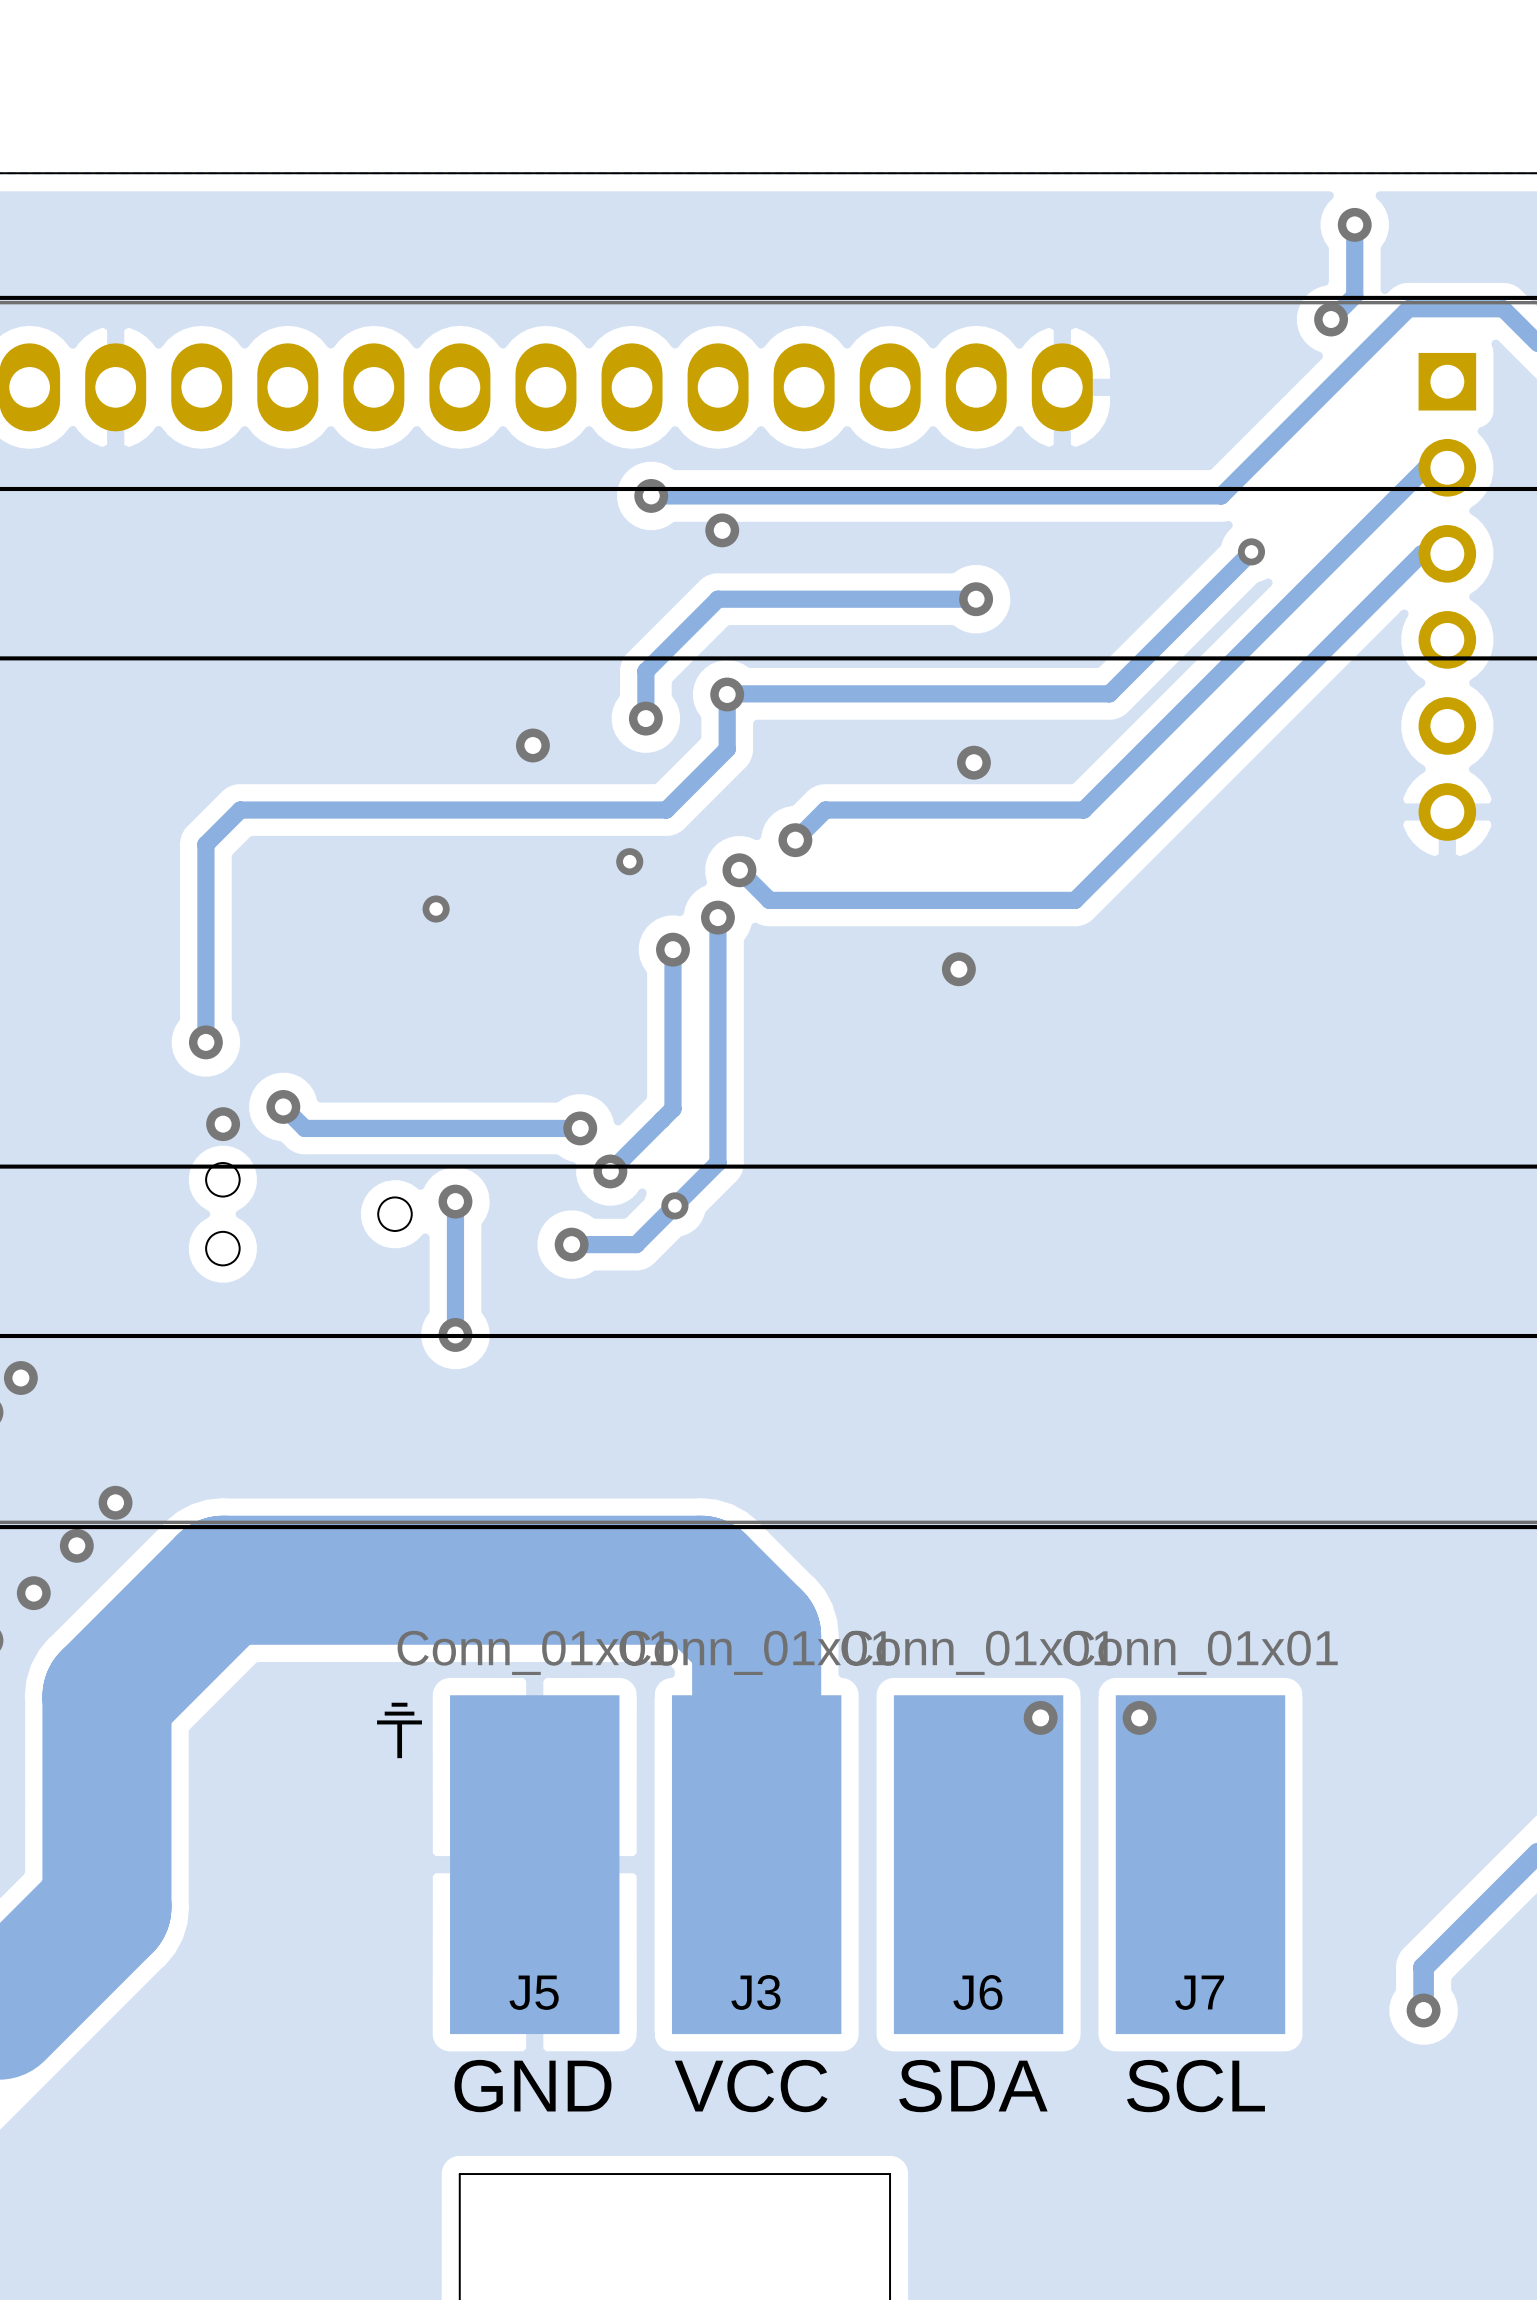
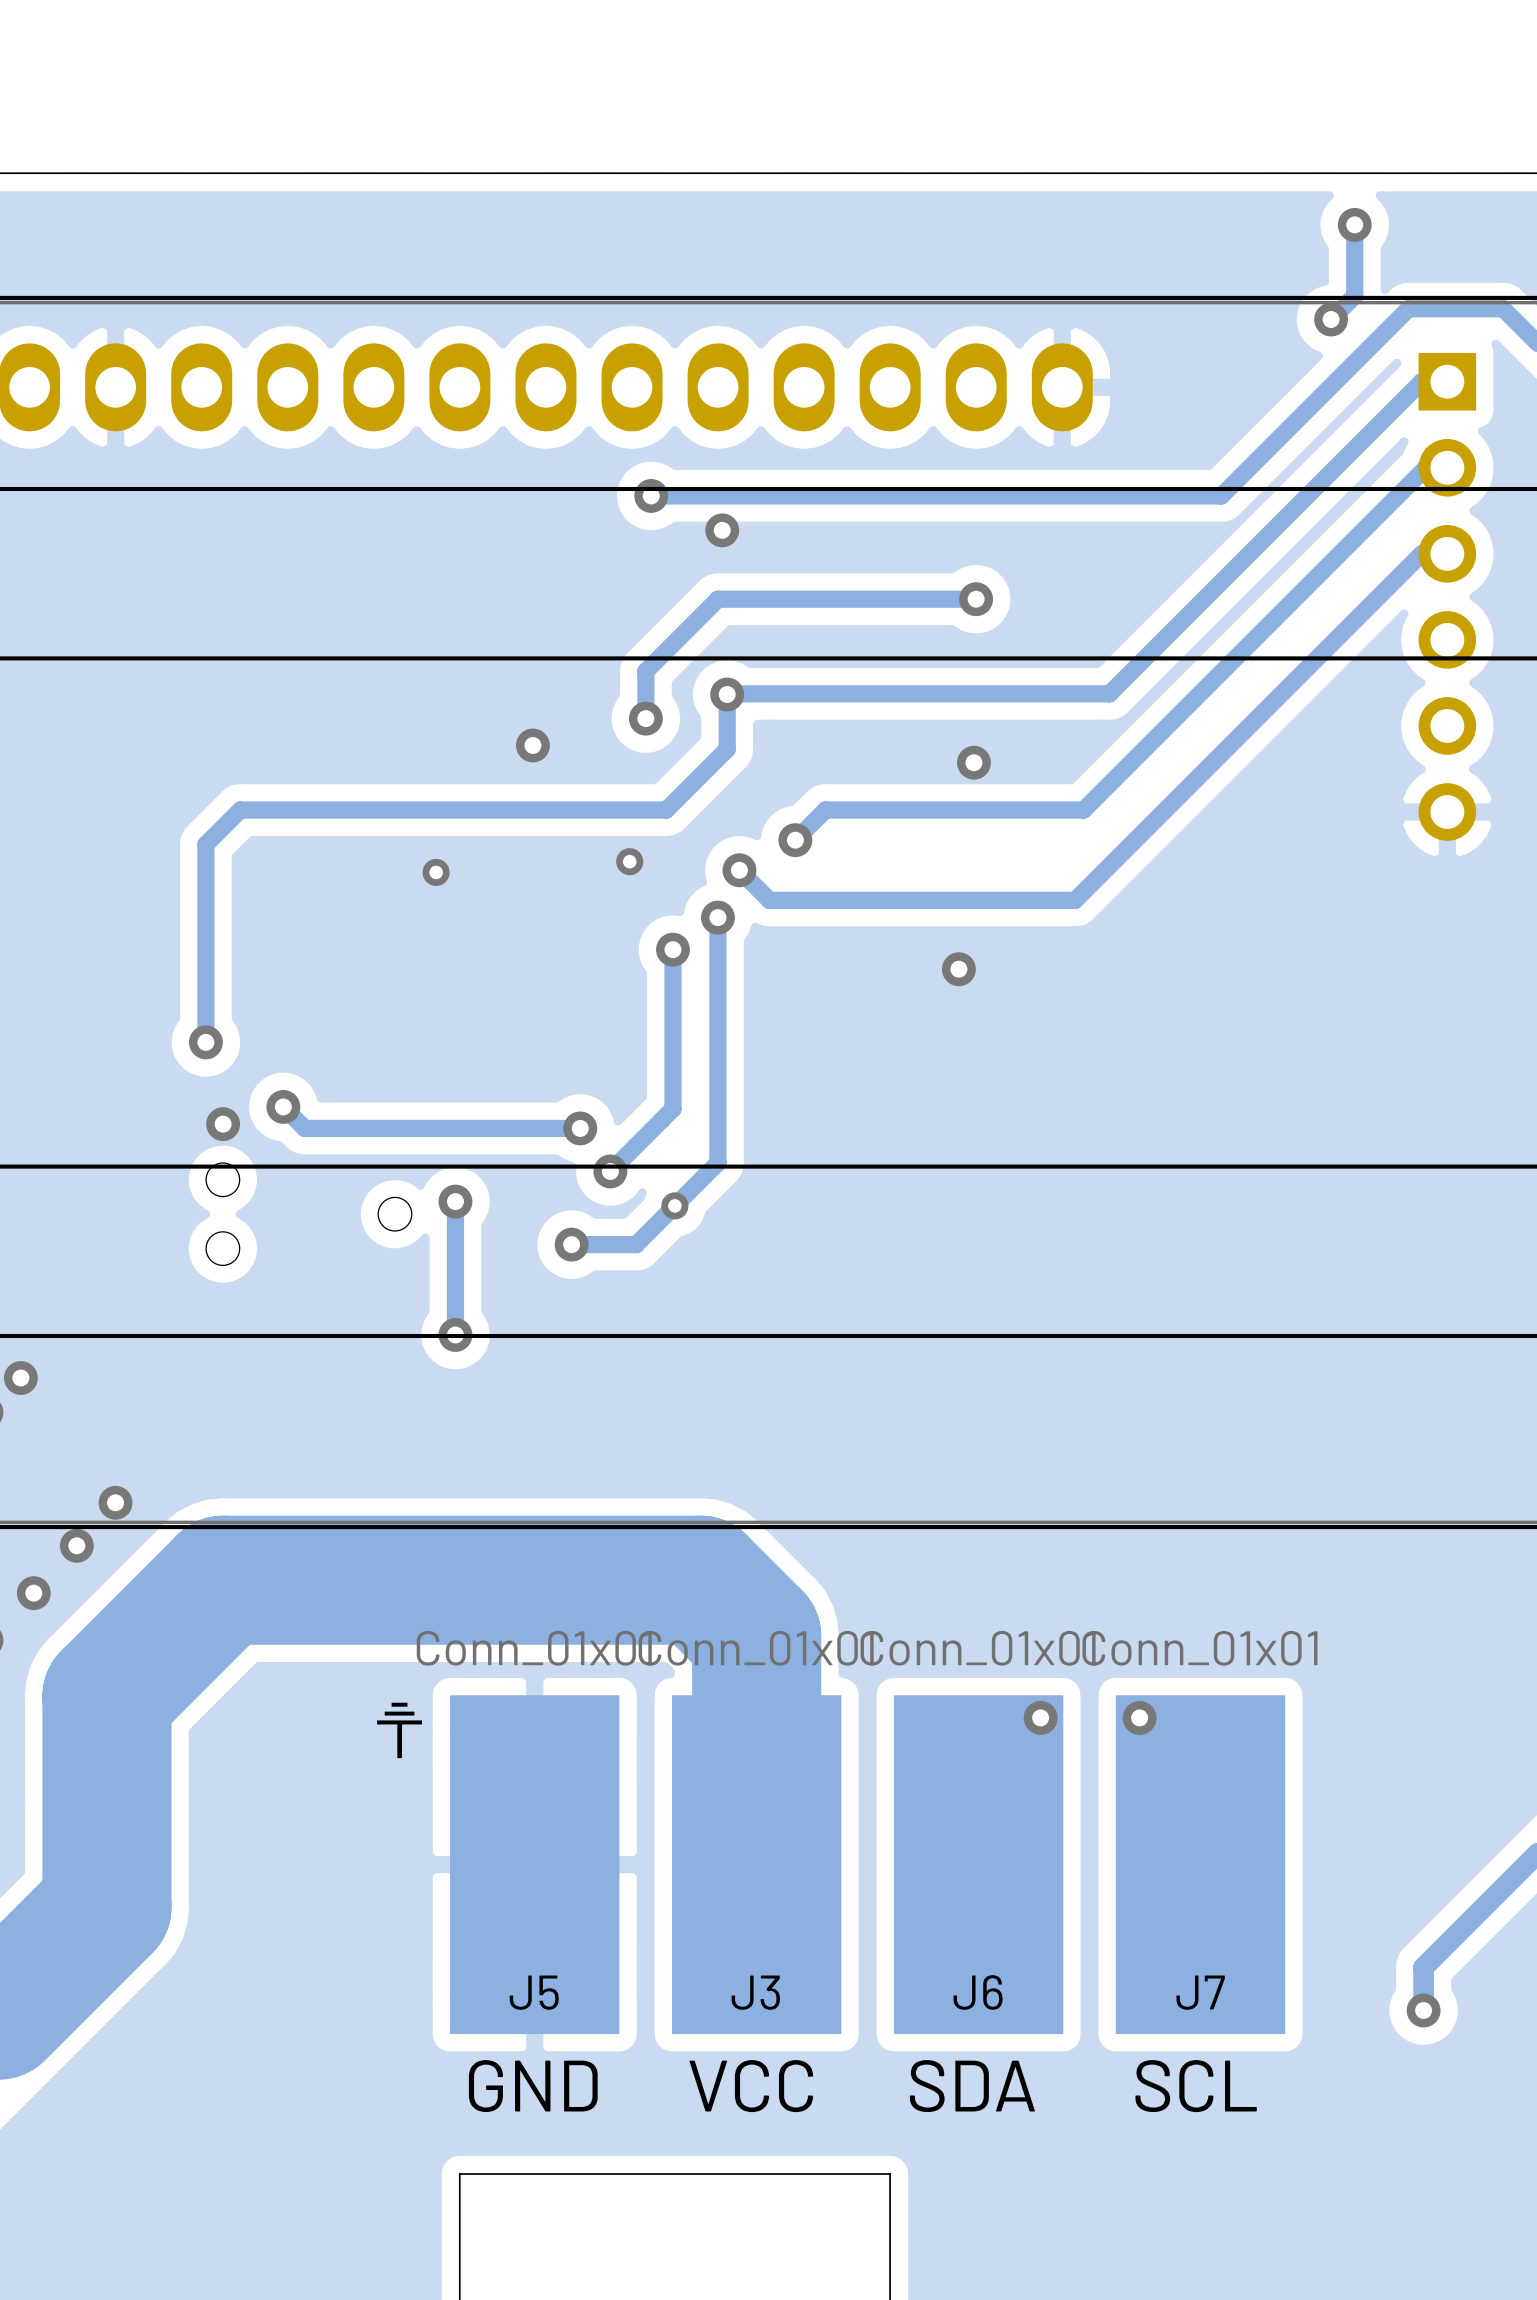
track: none -> (1447, 381) (1421, 381) (1251, 551)
via: (1251, 551) -> none
via position: (436, 909) -> (436, 872)

